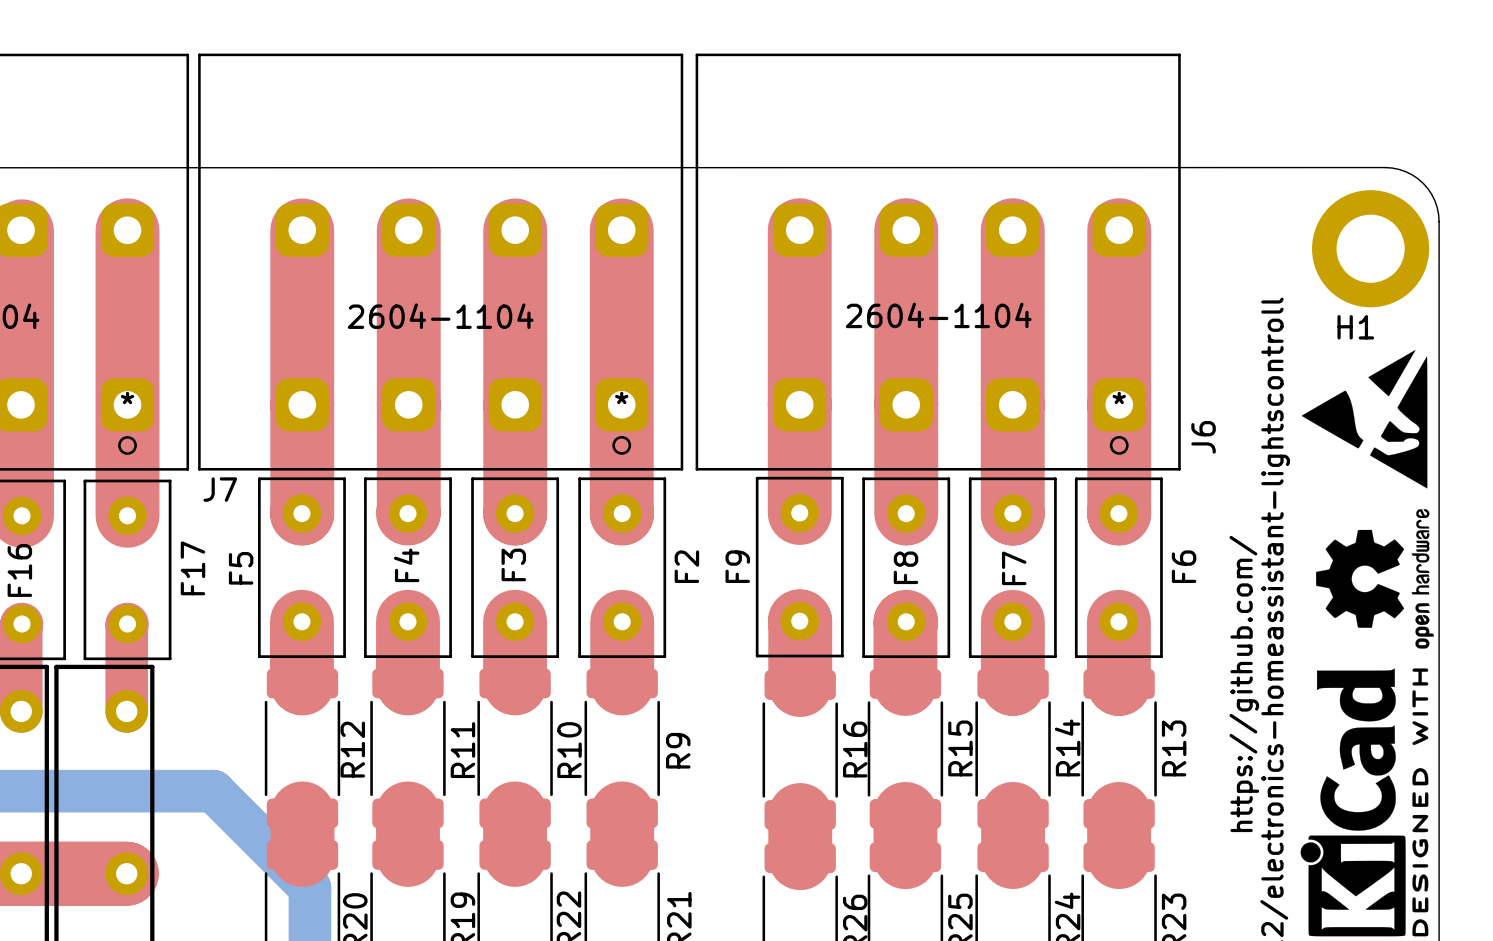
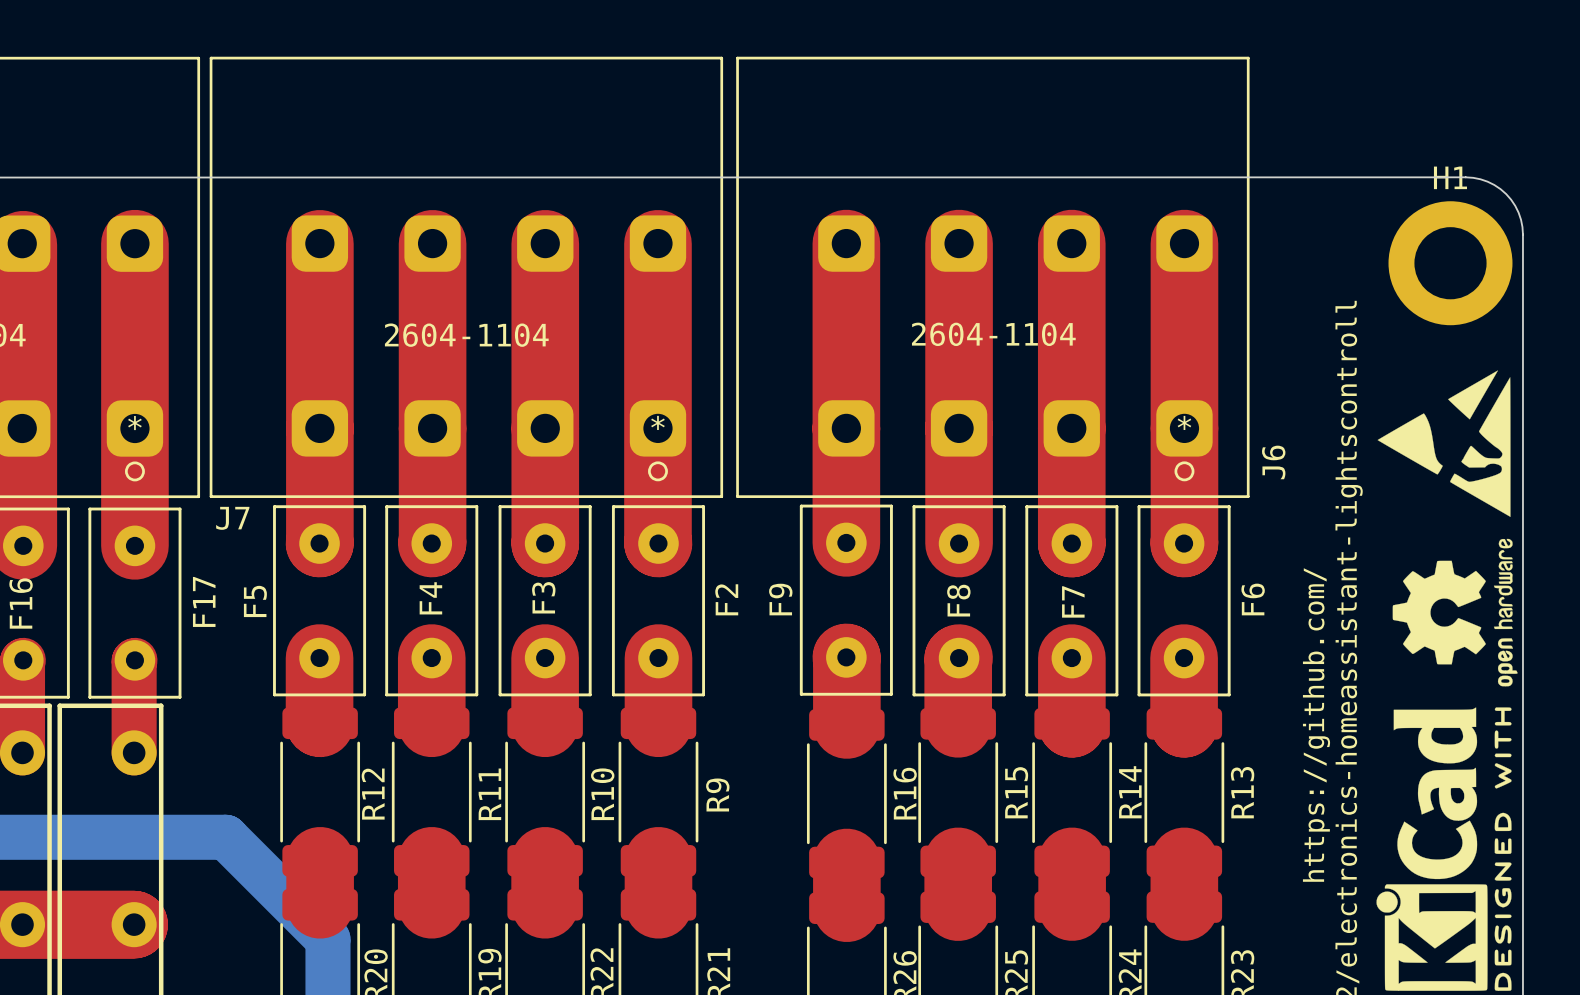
H1 name position: H1 (1355, 327) -> H1 (1450, 177)

